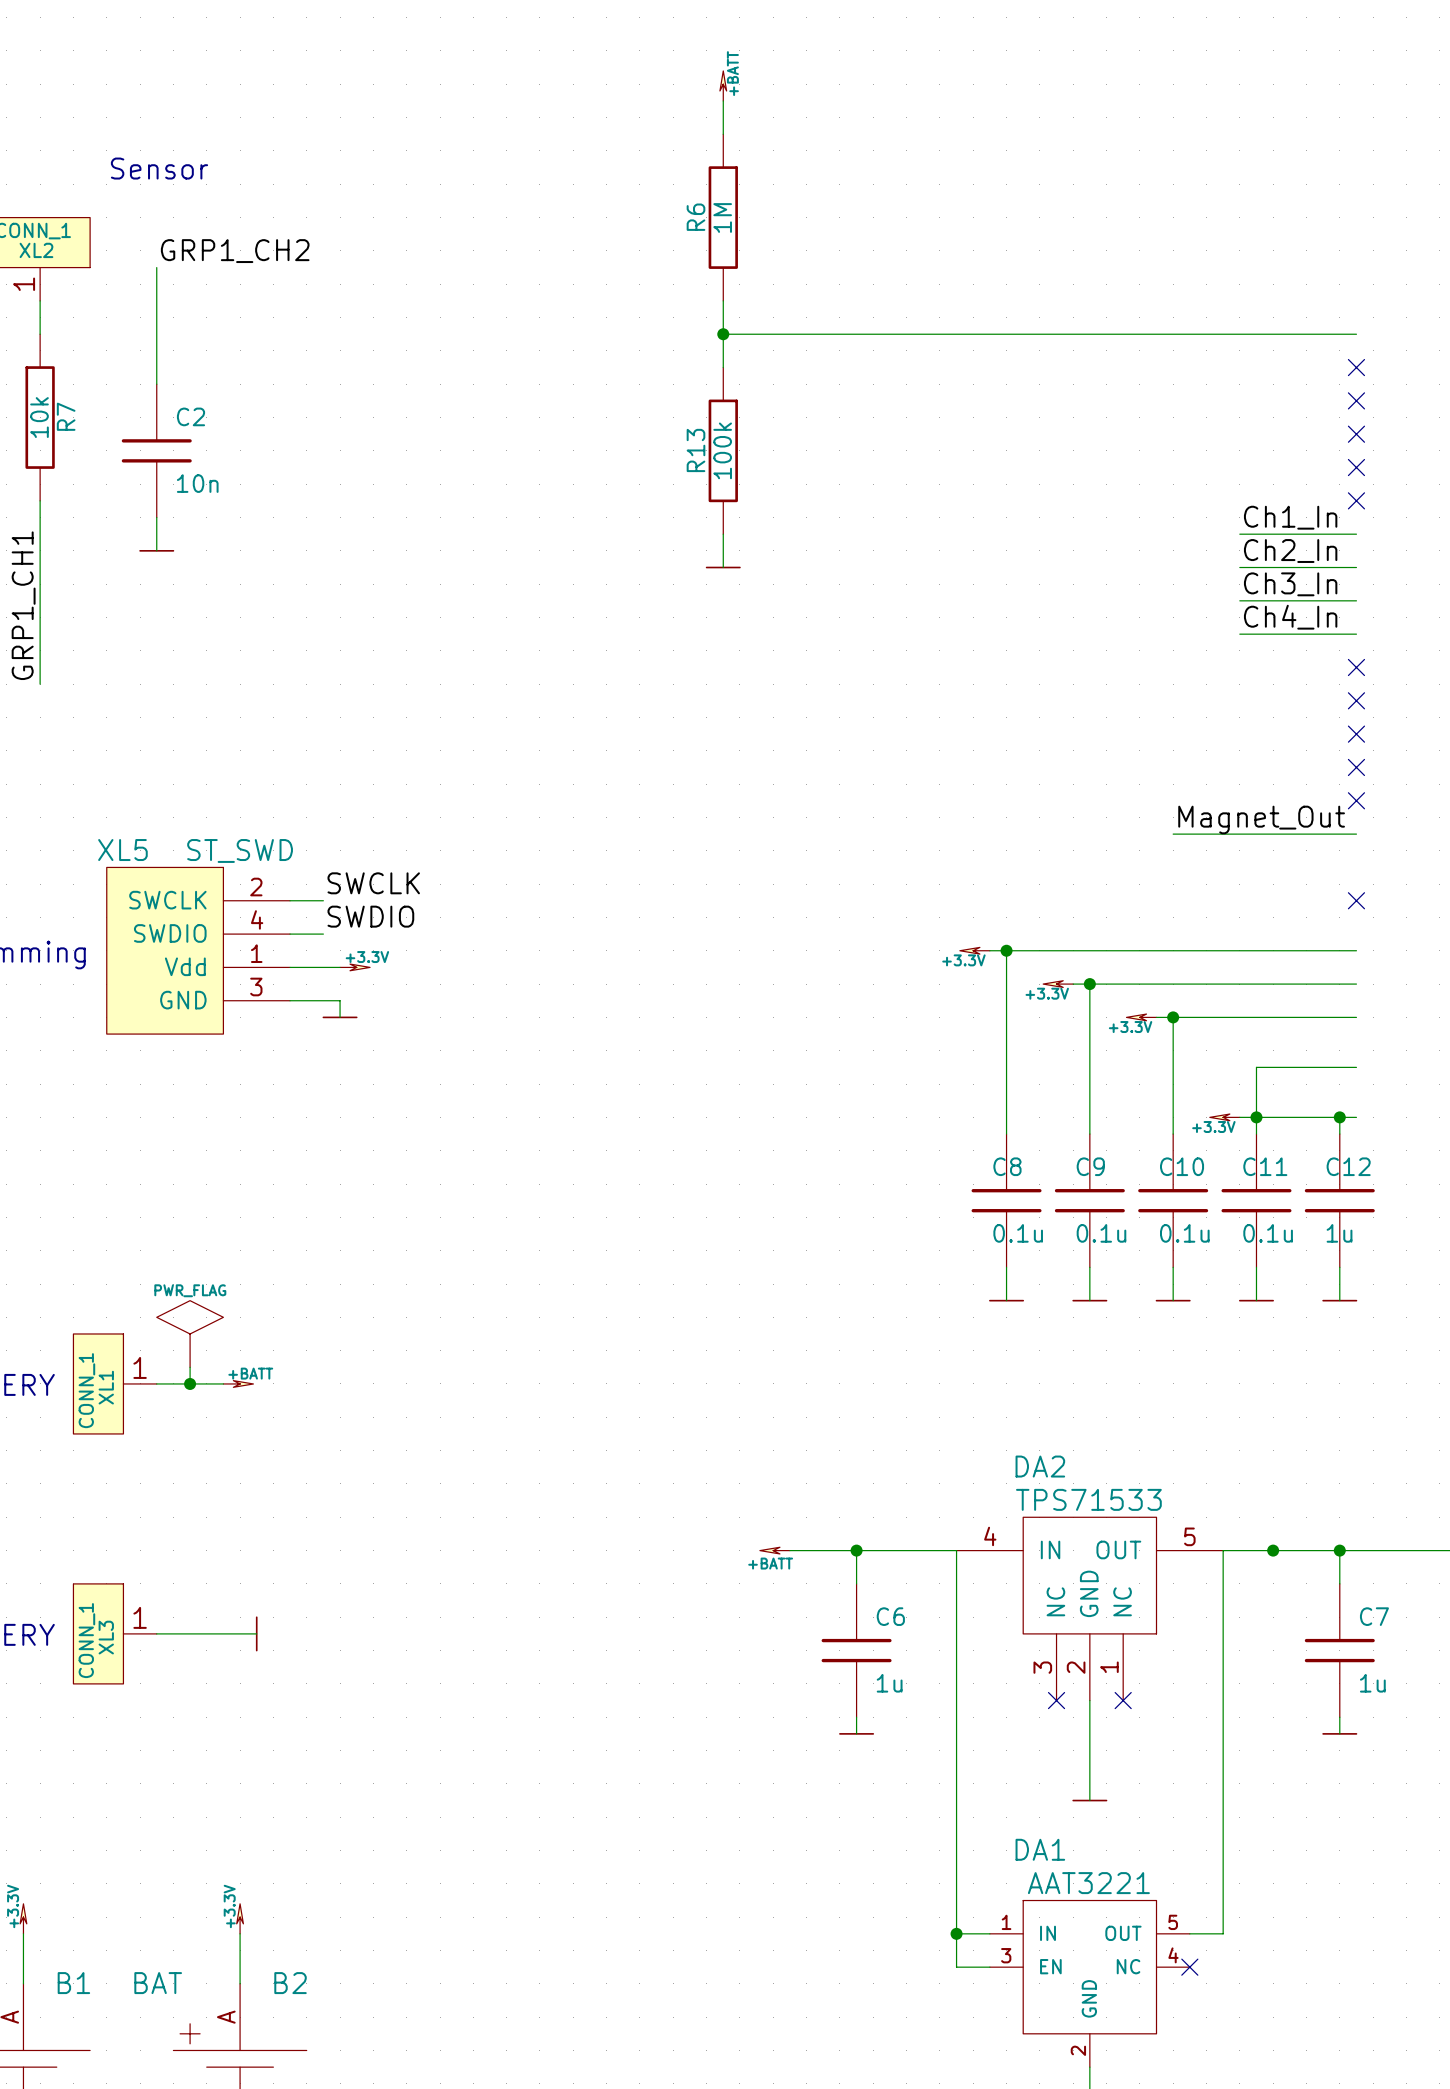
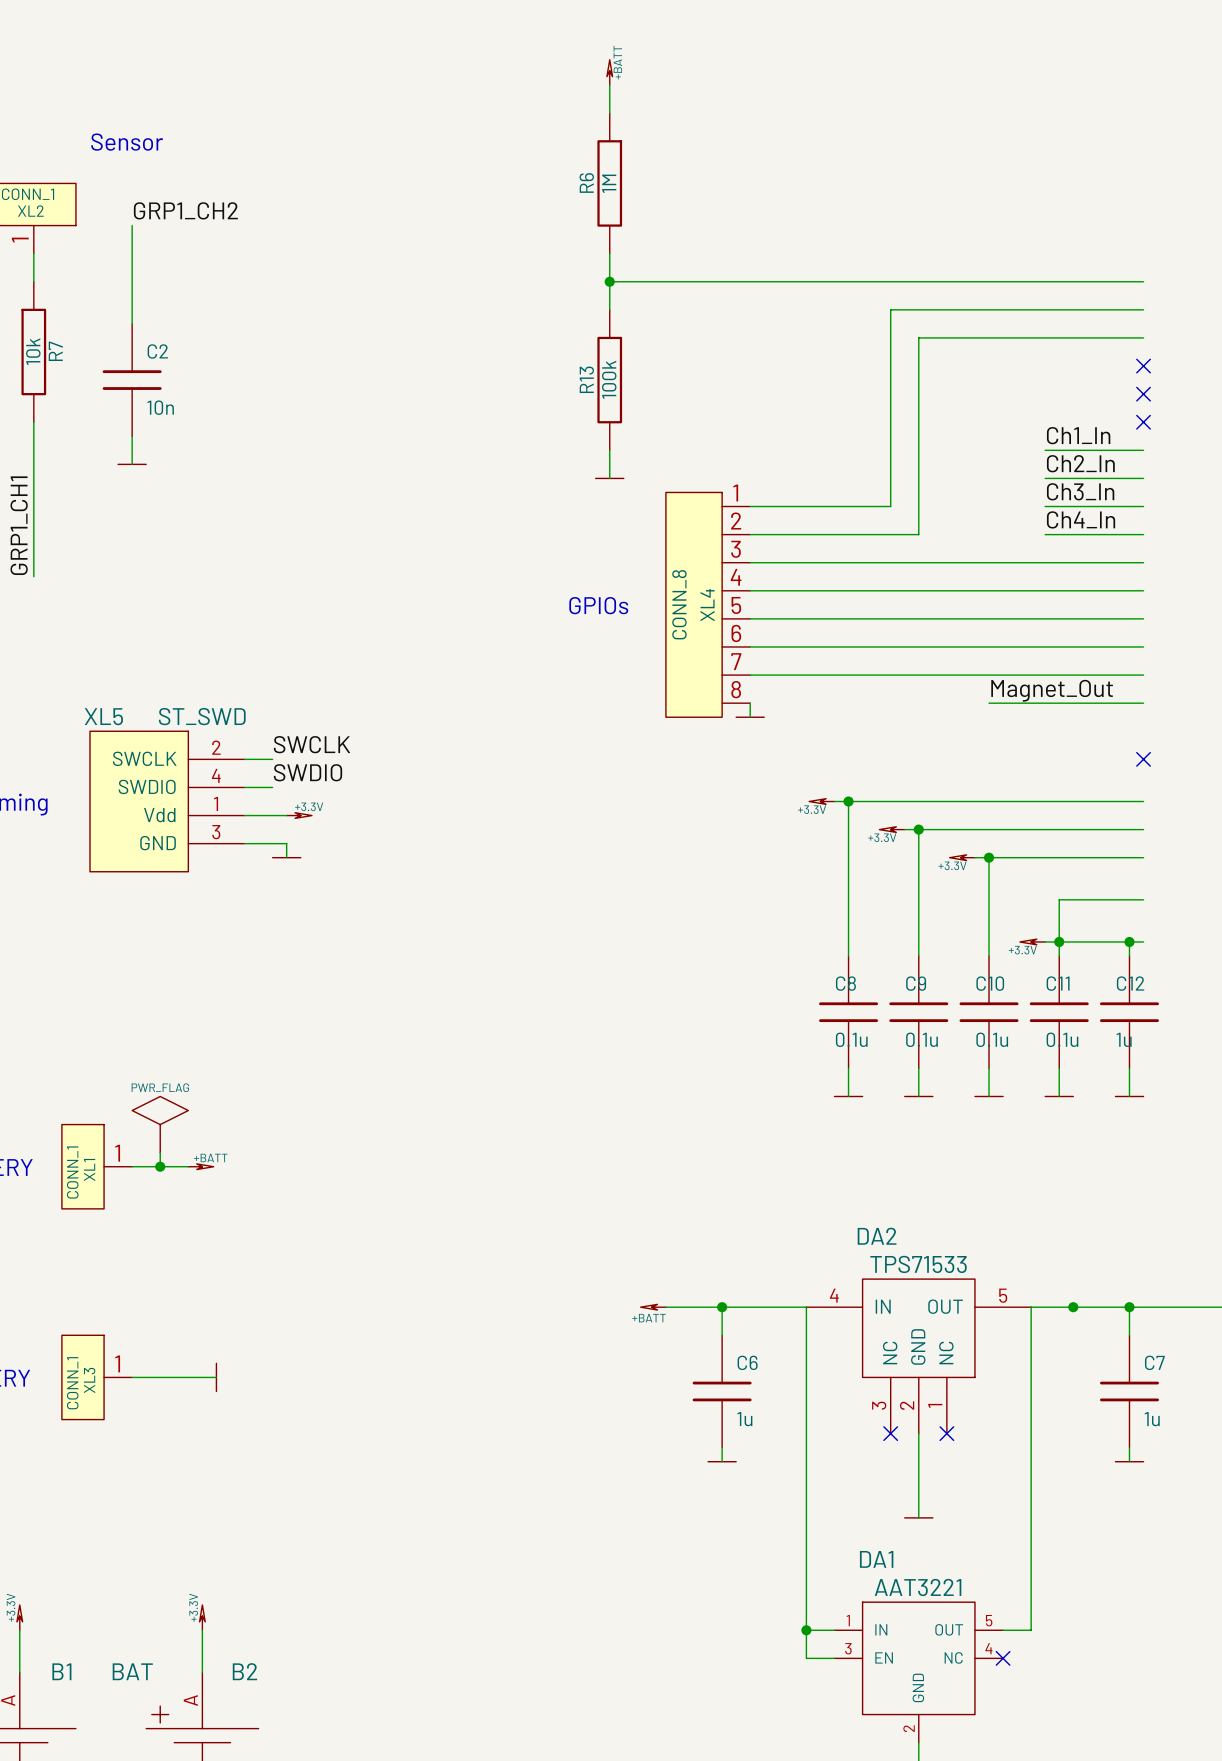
wire: none -> (1143, 309) (890, 309) (890, 506) (750, 506)
no-connect mark: (1356, 367) -> none
wire: none -> (1143, 337) (918, 337) (918, 534) (750, 534)
no-connect mark: (1356, 400) -> none
wire: none -> (750, 562) (1143, 562)
no-connect mark: (1356, 667) -> none
wire: none -> (750, 590) (1143, 590)
no-connect mark: (1356, 700) -> none
XL4: none -> CONN_8 (708, 604)
text: none -> GPIOs (598, 605)
wire: none -> (750, 618) (1143, 618)
no-connect mark: (1356, 734) -> none
wire: none -> (750, 646) (1143, 646)
no-connect mark: (1356, 767) -> none
wire: none -> (750, 675) (1143, 675)
no-connect mark: (1356, 800) -> none
wire: none -> (750, 703) (750, 717)
power symbol: none -> (750, 717)

